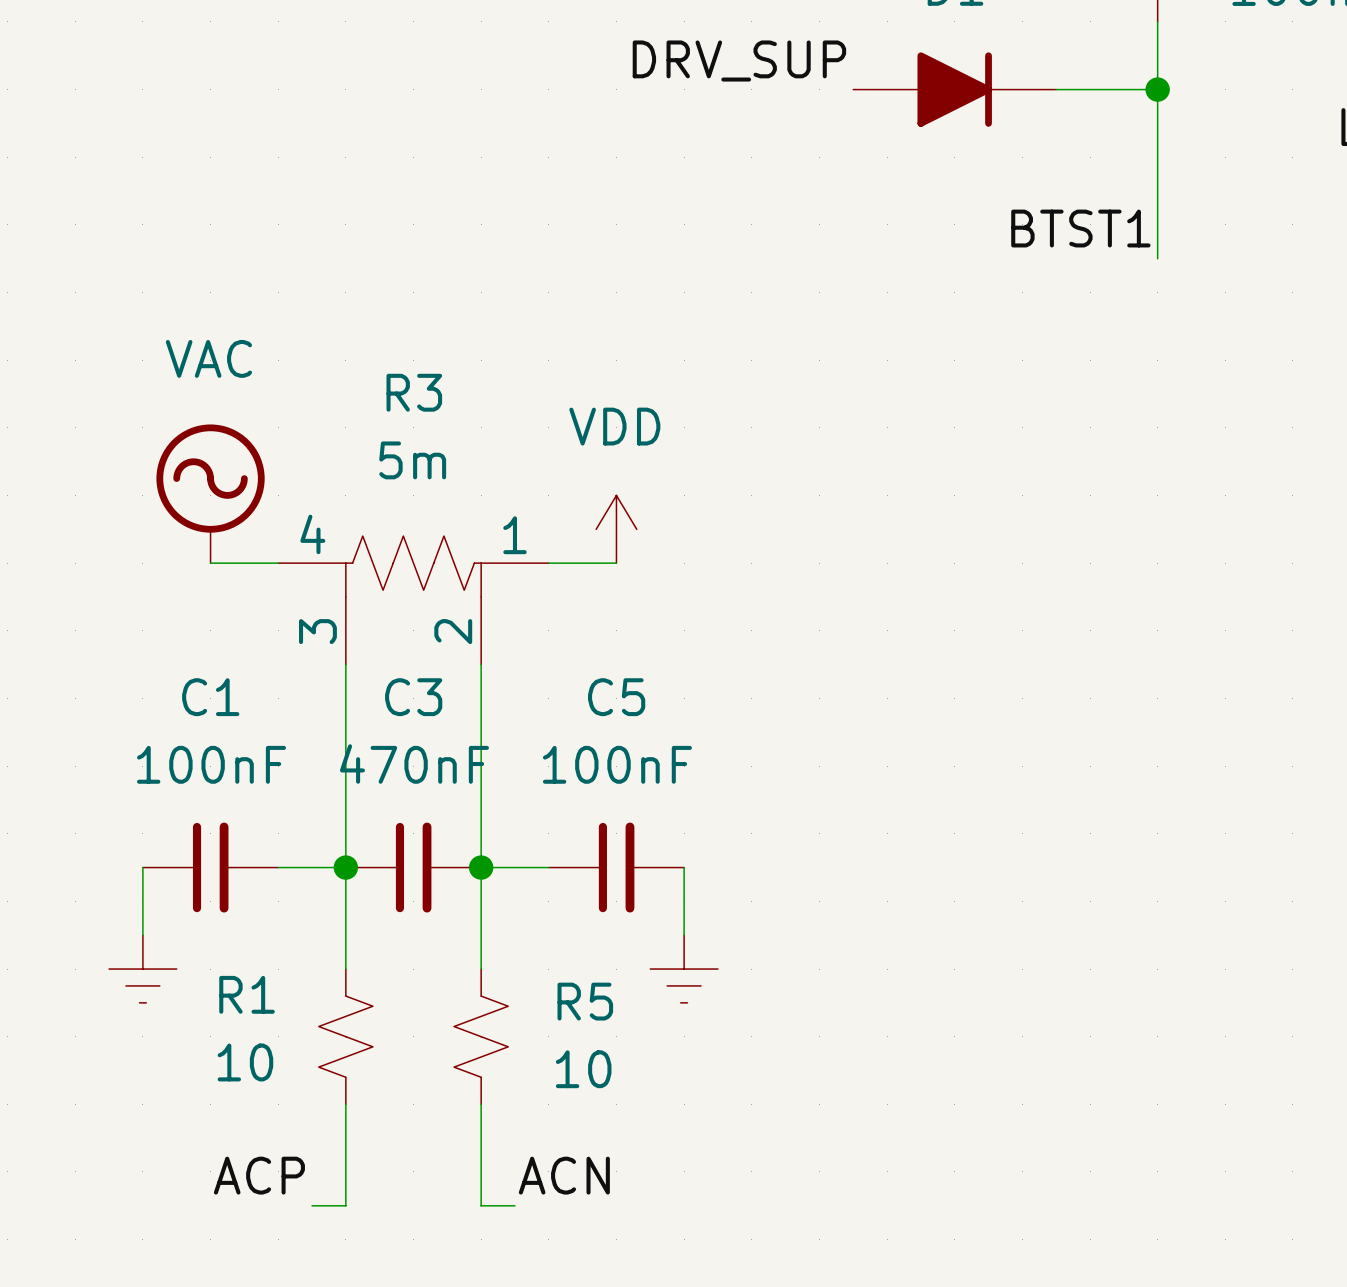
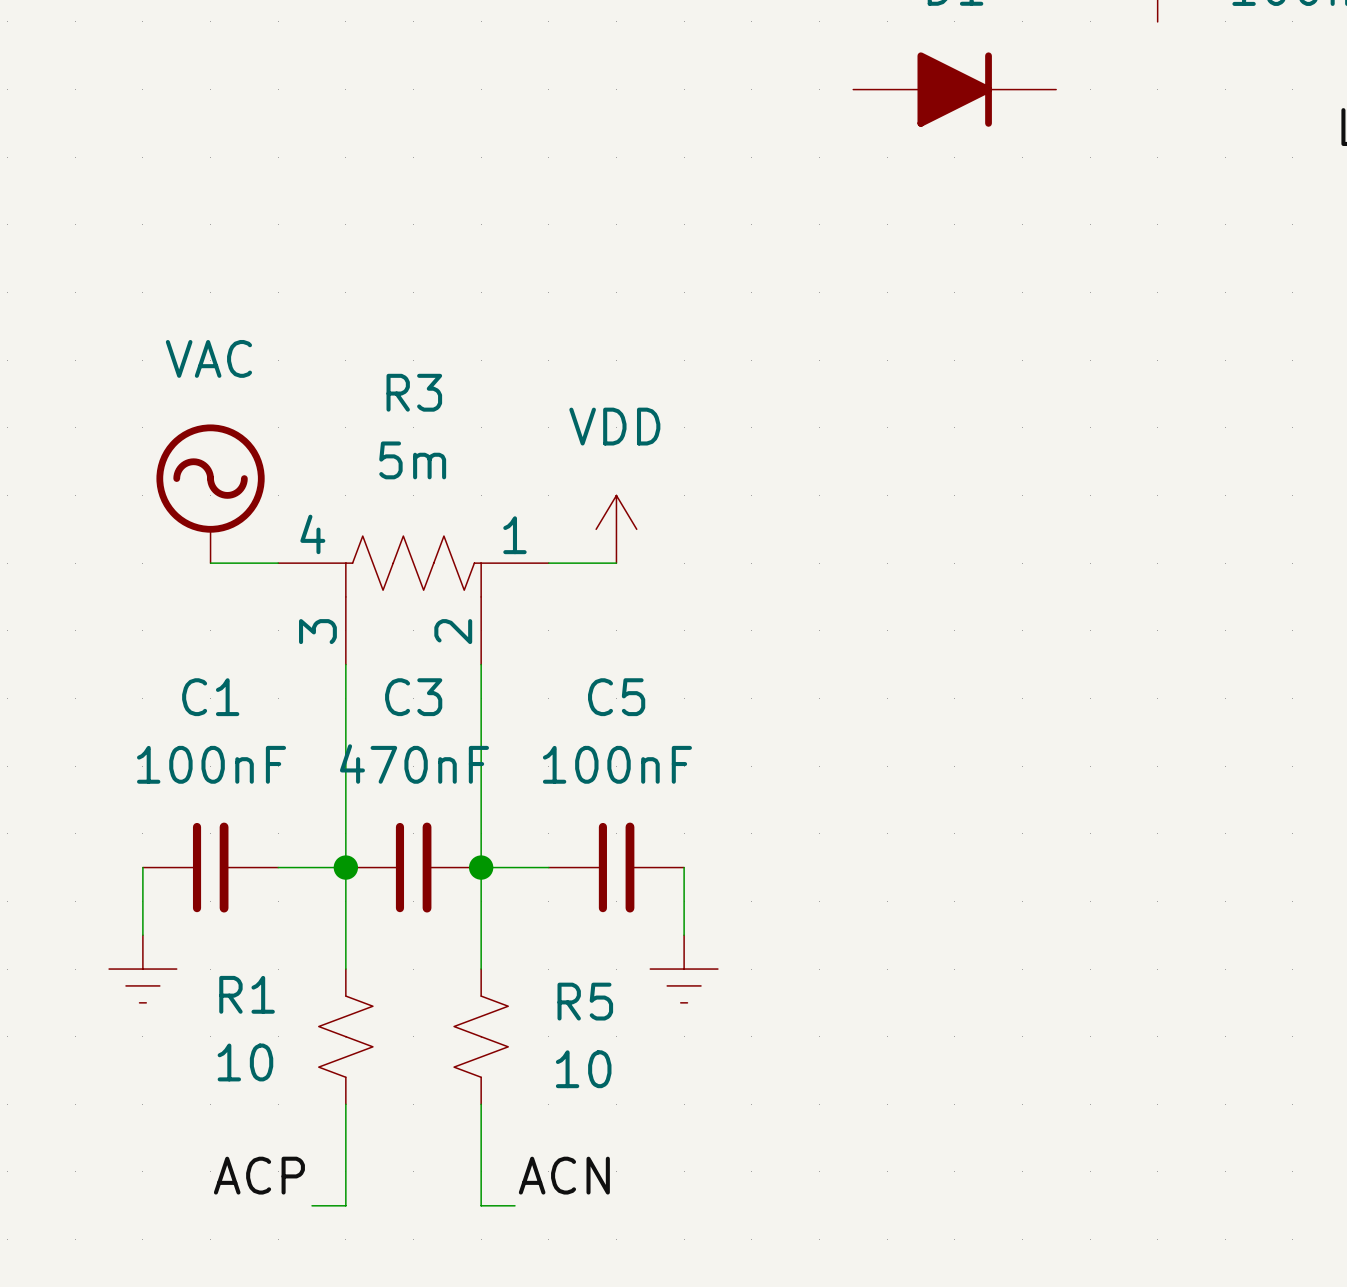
wire: (1157, 21) (1157, 258) -> none
label: DRV_SUP (739, 61) -> none
wire: (1056, 89) (1157, 89) -> none
junction: (1157, 89) -> none
label: BTST1 (1080, 228) -> none

